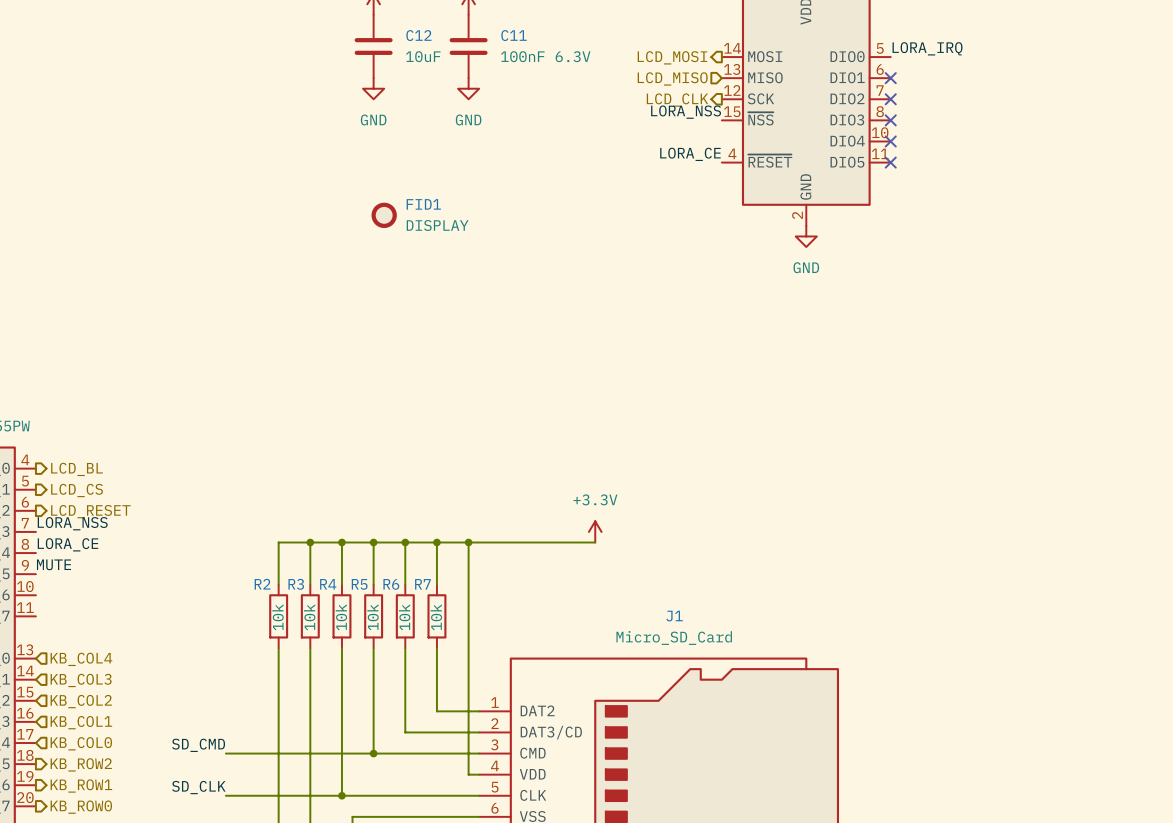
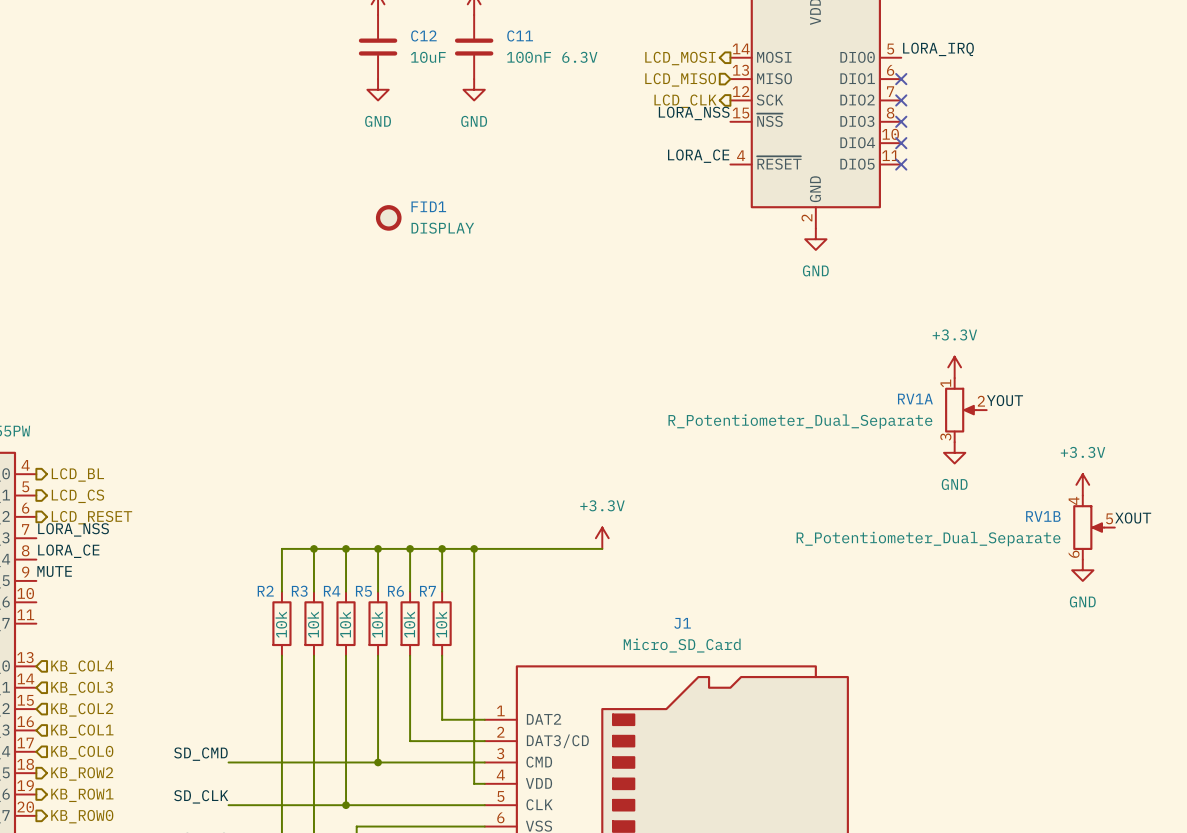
power symbol: none -> +3.3V (954, 367)
label: none -> YOUT (1004, 400)
RV1A: none -> R_Potentiometer_Dual_Separate (965, 410)
power symbol: none -> GND (954, 452)
power symbol: none -> +3.3V (1082, 484)
label: none -> XOUT (1133, 518)
RV1B: none -> R_Potentiometer_Dual_Separate (1094, 527)
power symbol: none -> GND (1082, 570)

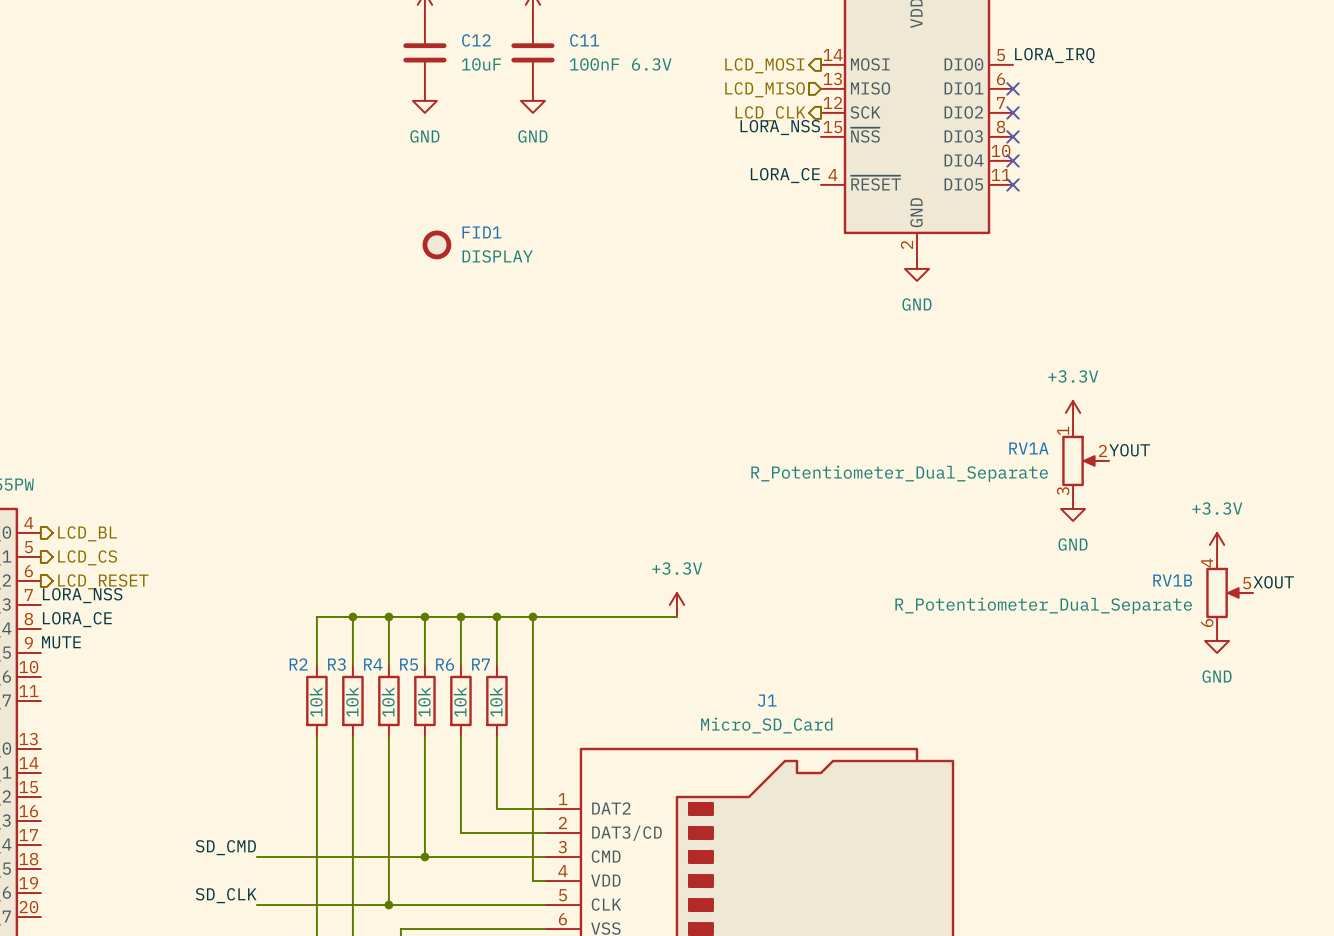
hierarchical label: KB_COL4 (82, 667) -> none
hierarchical label: KB_COL3 (82, 688) -> none
hierarchical label: KB_COL2 (82, 709) -> none
hierarchical label: KB_COL1 (82, 731) -> none
hierarchical label: KB_COL0 (82, 752) -> none
hierarchical label: KB_ROW2 (82, 773) -> none
hierarchical label: KB_ROW1 (82, 795) -> none
hierarchical label: KB_ROW0 (82, 816) -> none

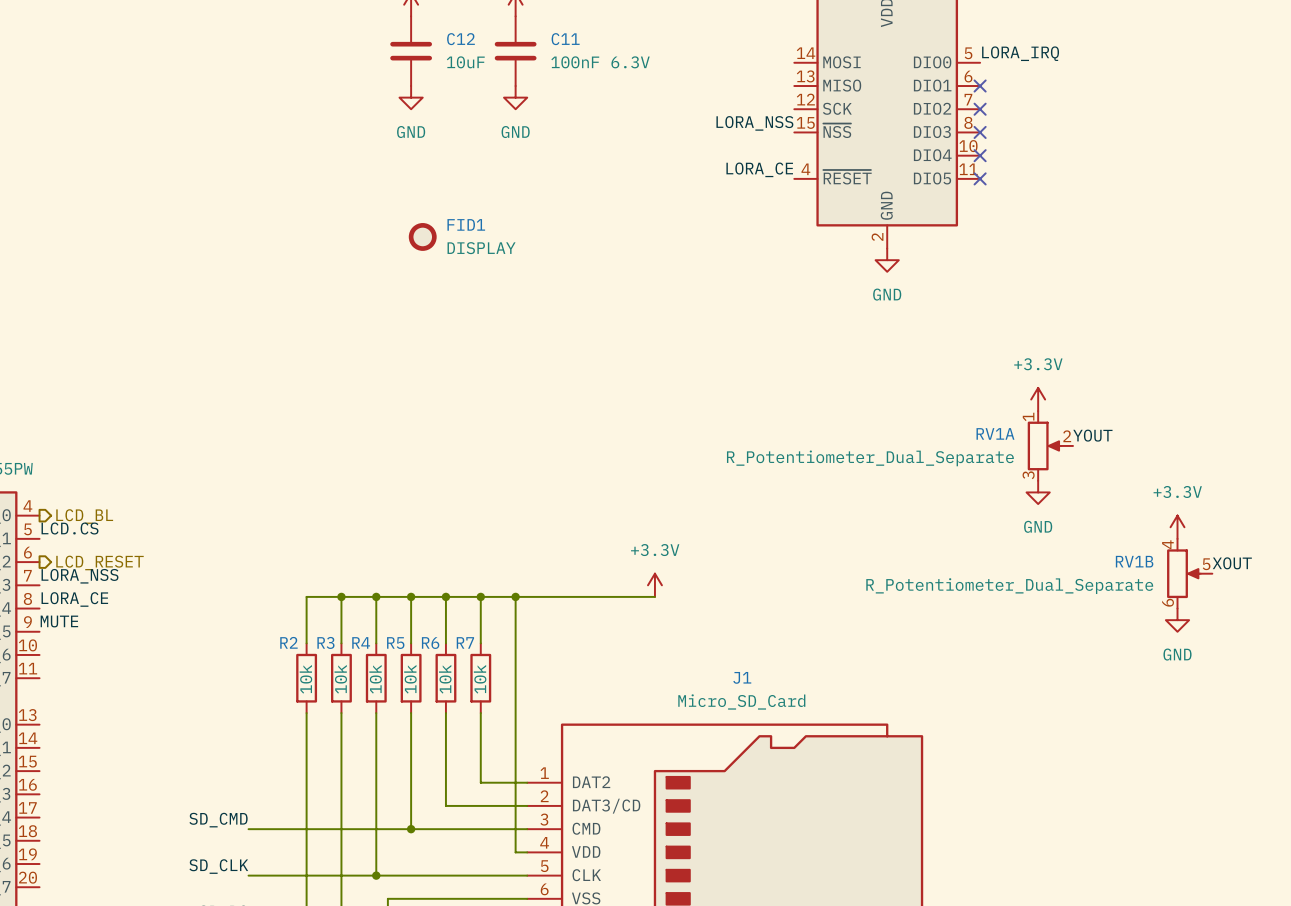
hierarchical label: LCD_MOSI (764, 65) -> none
hierarchical label: LCD_MISO (765, 89) -> none
hierarchical label: LCD_CLK (770, 113) -> none
label: none -> LCD.CS (70, 528)
hierarchical label: LCD_CS (87, 557) -> none

